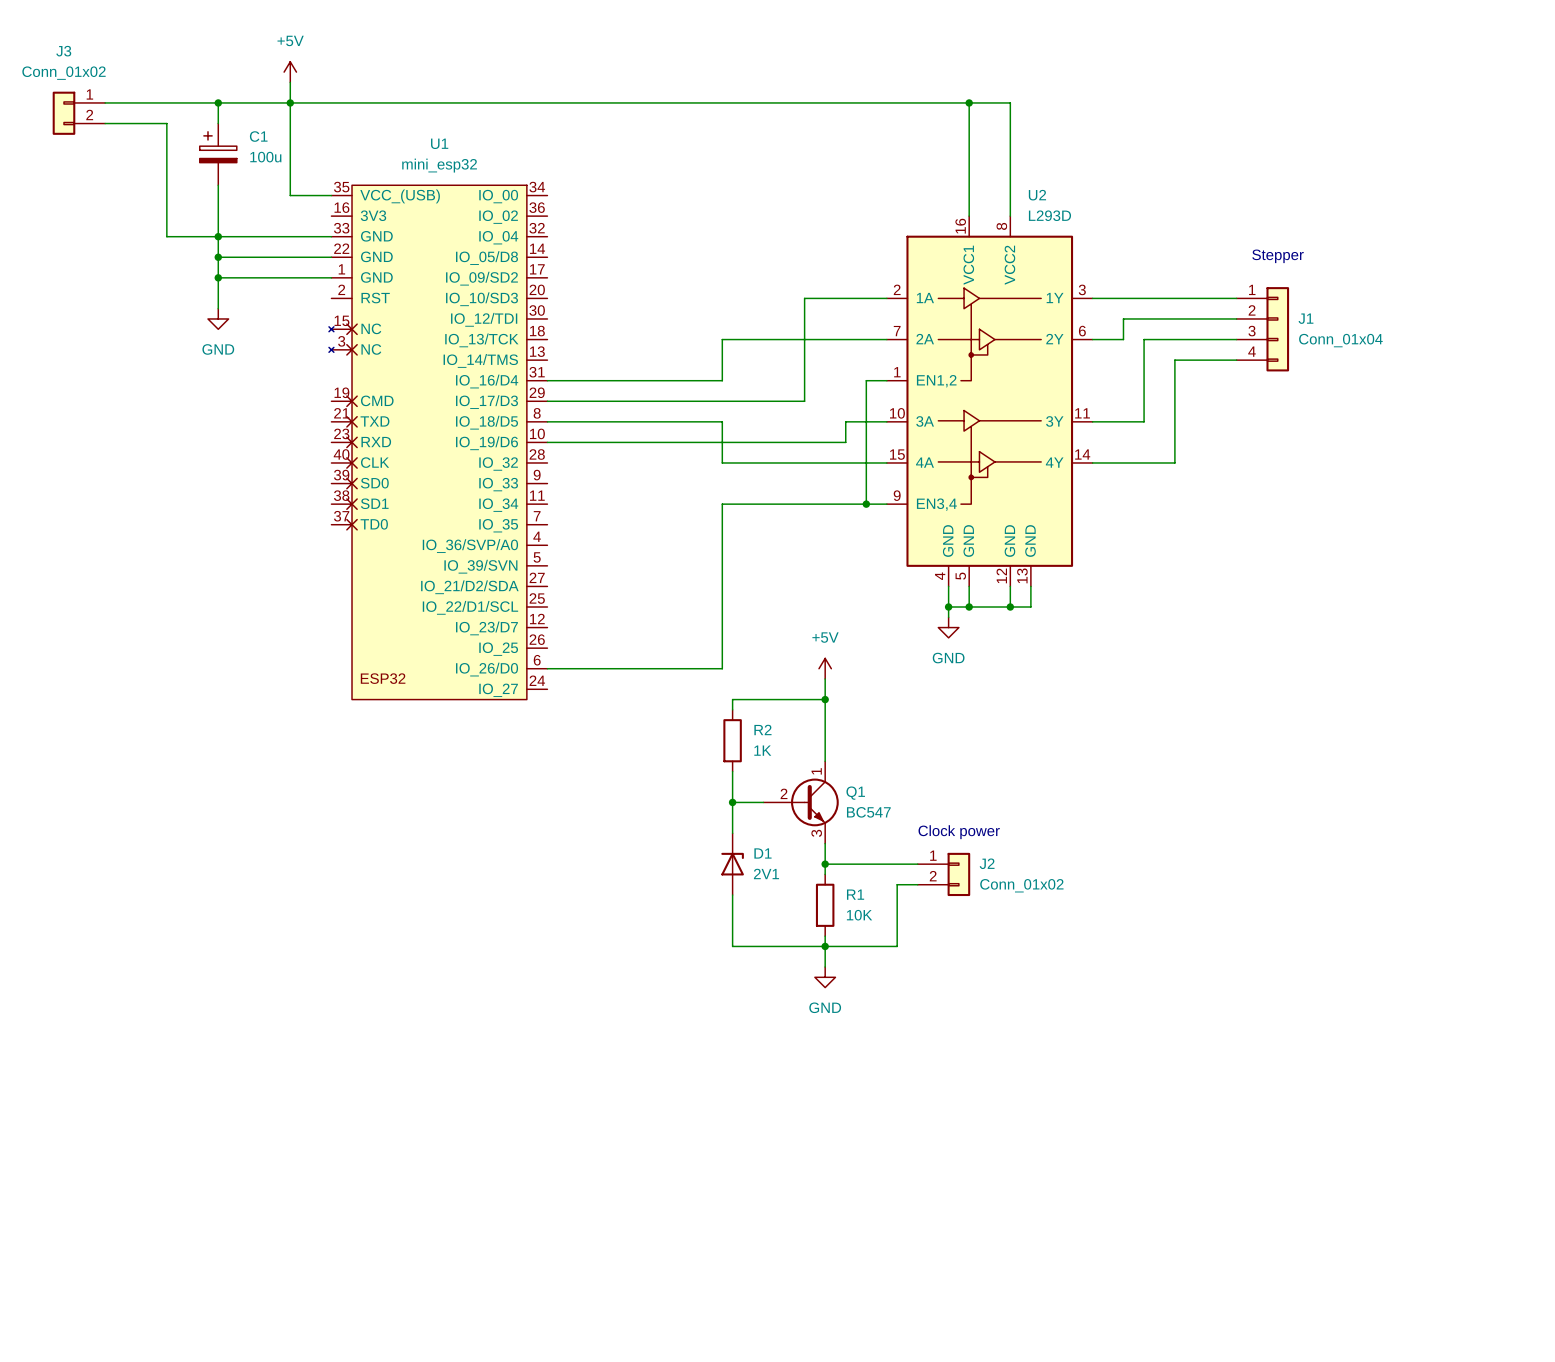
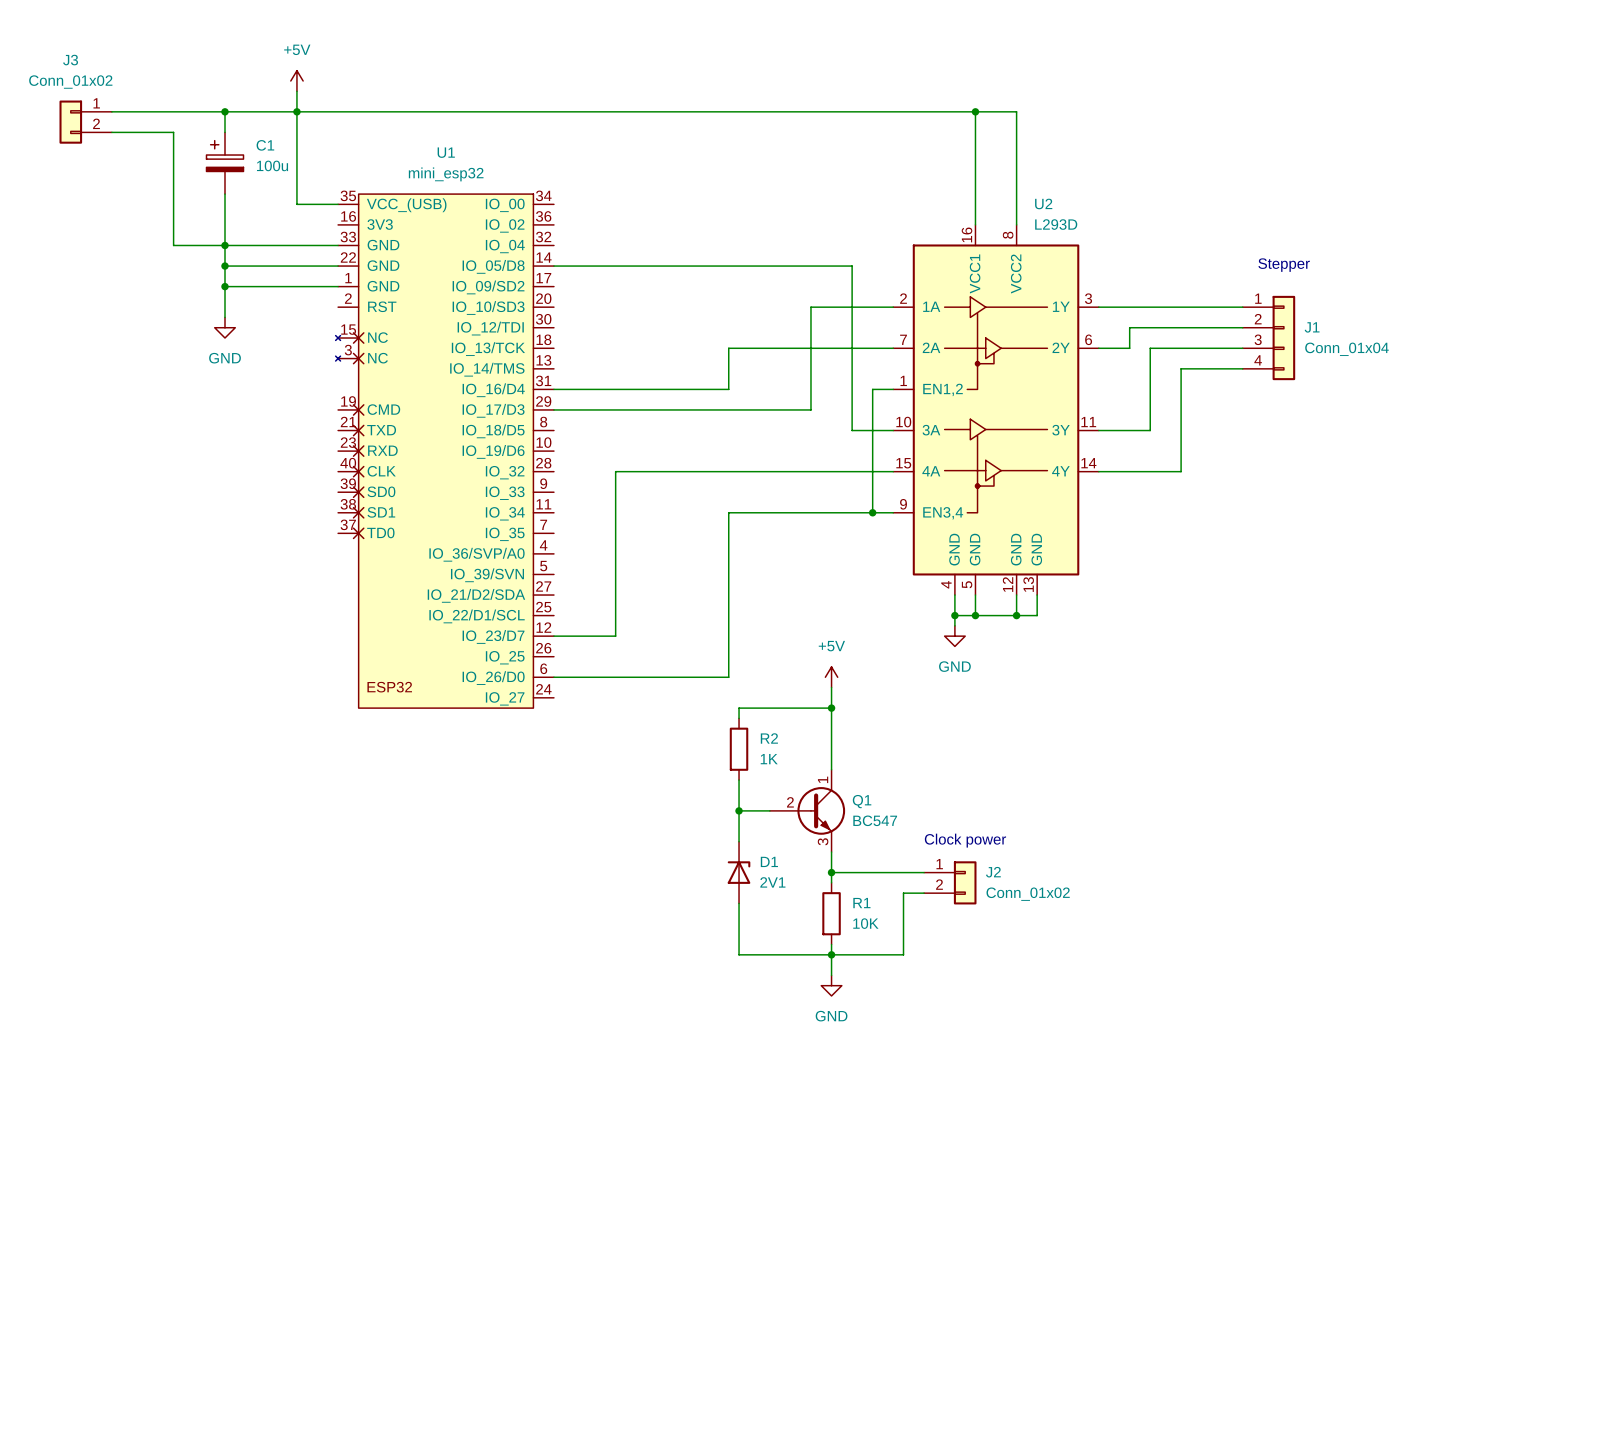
wire: (547, 421) (722, 421) (722, 462) -> (553, 636) (615, 636) (615, 471) (728, 471)
wire: (845, 421) (845, 442) (547, 442) -> (852, 430) (852, 266) (553, 266)

